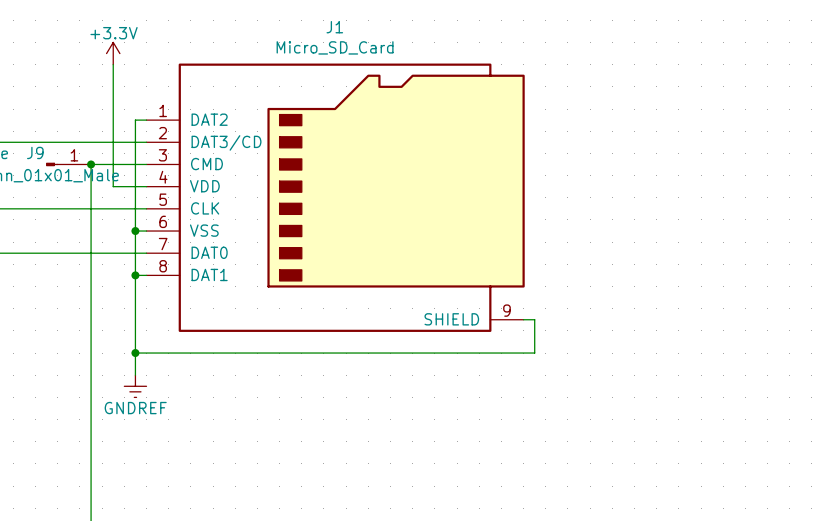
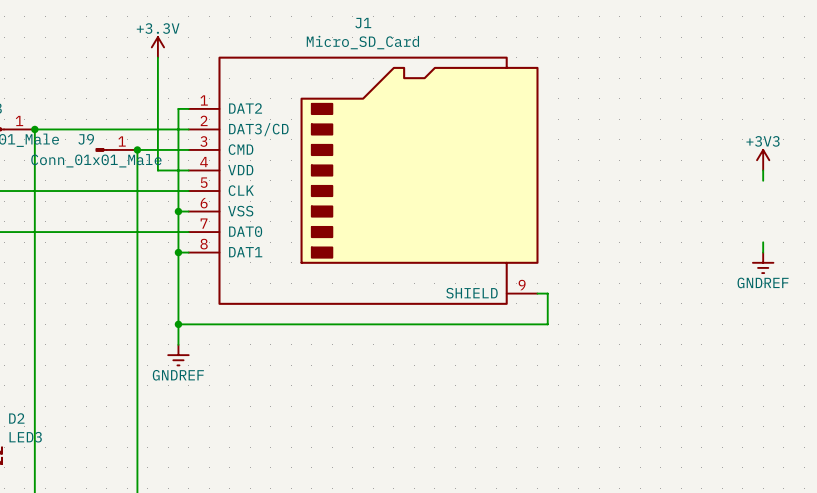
power symbol: none -> +3V3 (763, 160)
wire: none -> (763, 170) (763, 180)
wire: none -> (763, 242) (763, 252)
power symbol: none -> GNDREF (763, 262)

